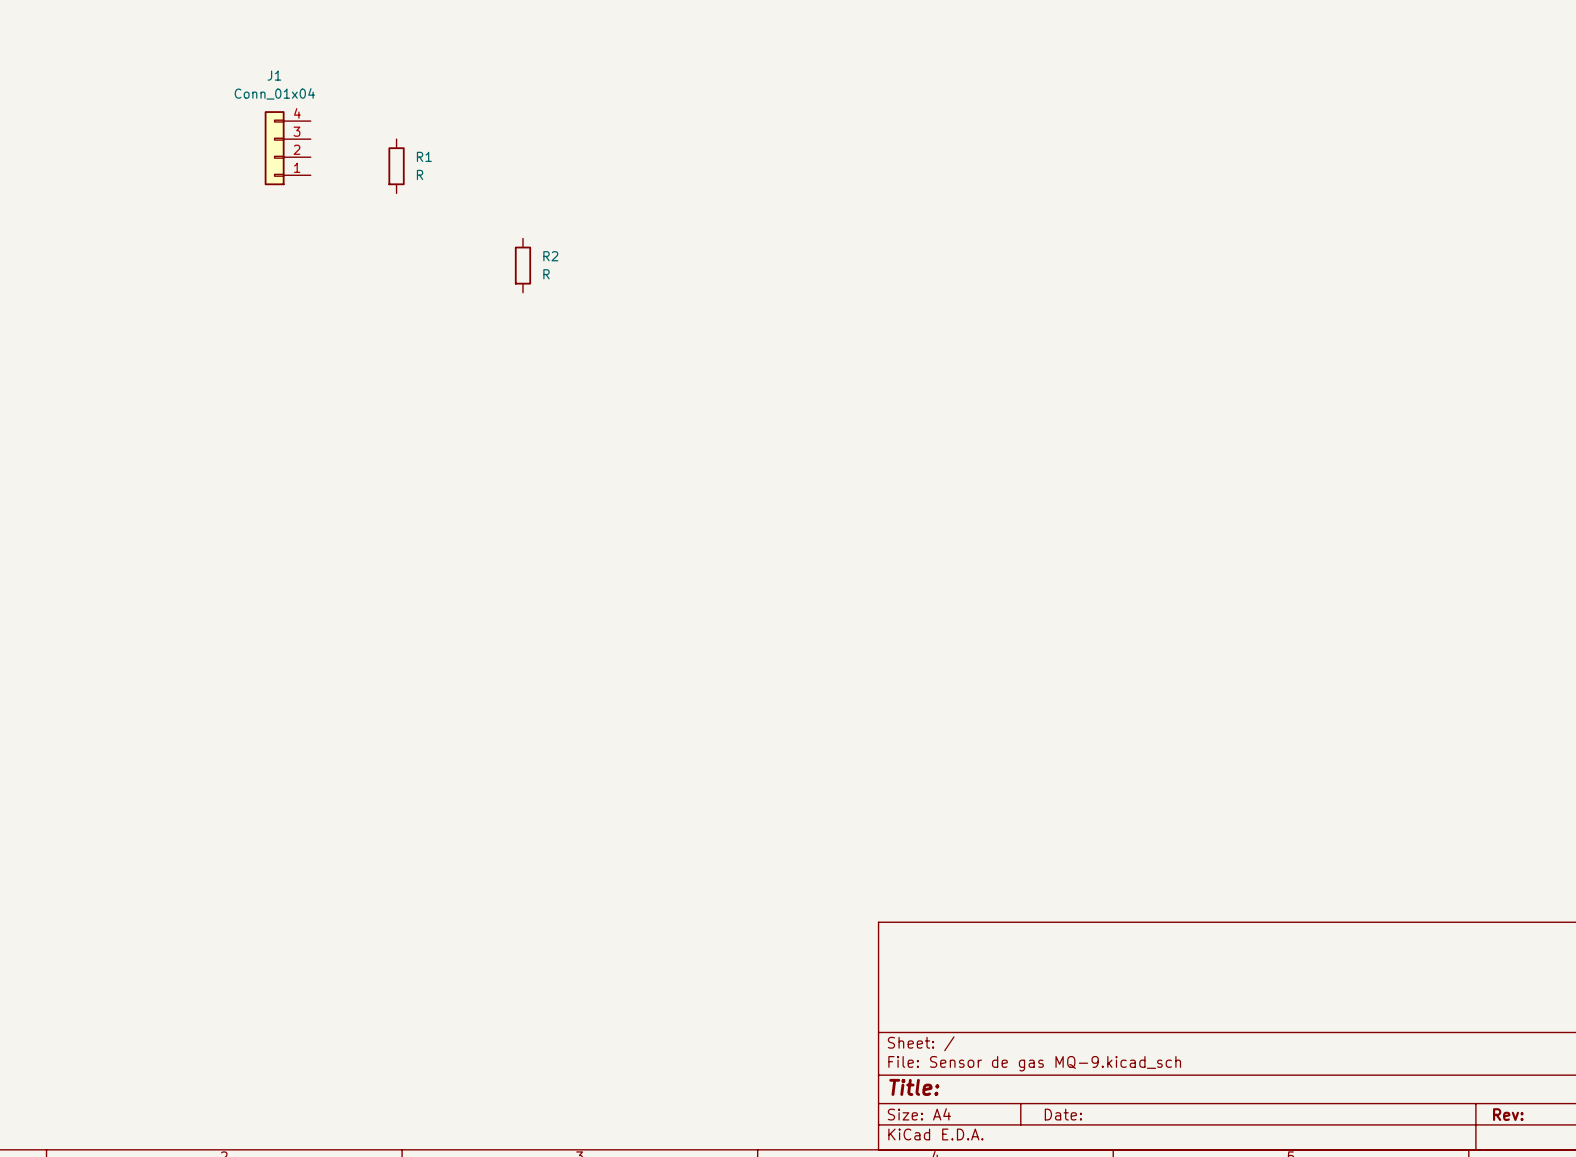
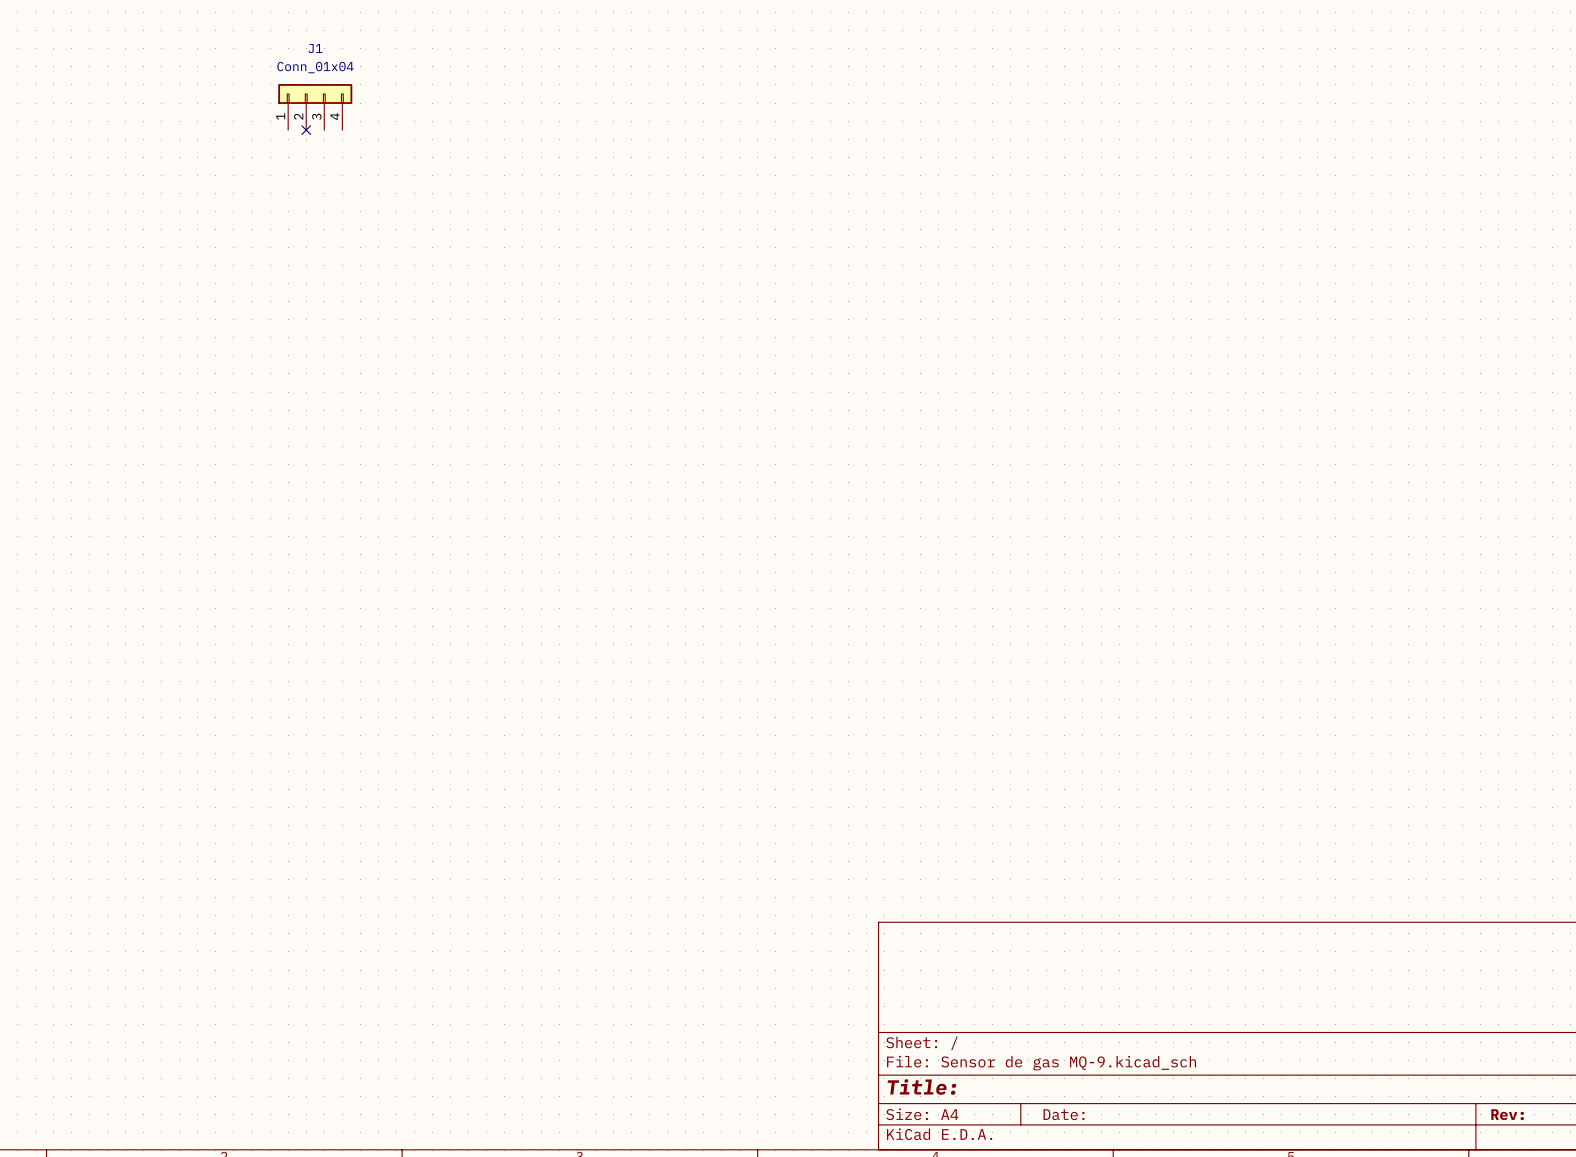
J1 name position: J1 (274, 75) -> J1 (315, 48)
J1 value position: Conn_01x04 (274, 93) -> Conn_01x04 (315, 67)
no-connect mark: none -> (306, 130)
J1 rotation: 0° (274, 148) -> 90° clockwise (315, 93)
J1 position: (287, 148) -> (315, 107)
R1: R (396, 166) -> none
R2: R (522, 265) -> none

